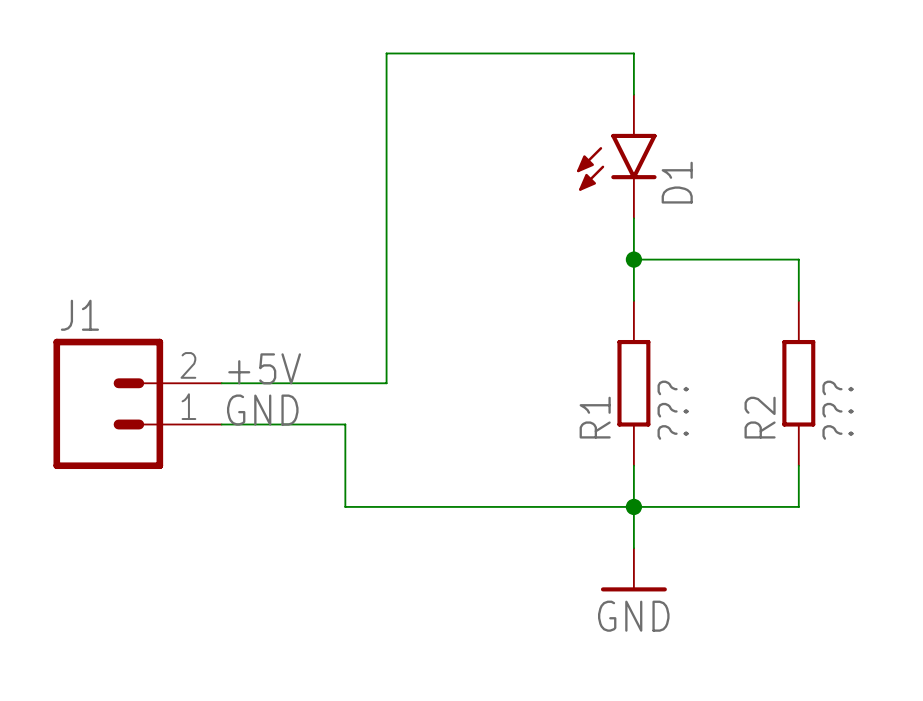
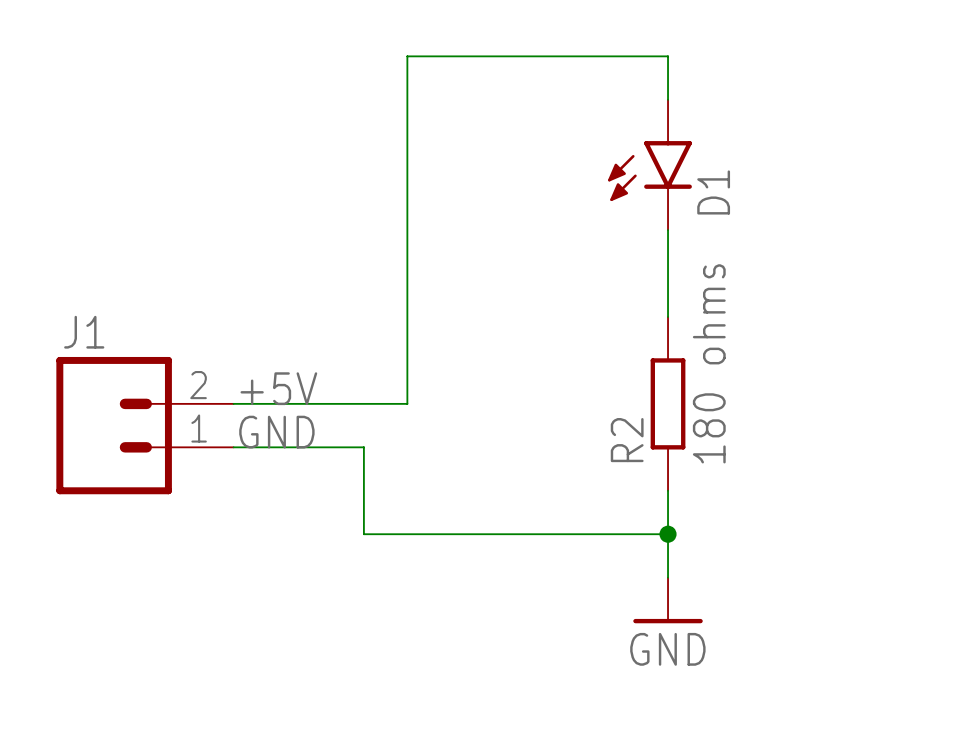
wire: (633, 259) (798, 259) (798, 300) -> none
junction: (633, 259) -> none
R2: ??? (798, 383) -> none
R1 value: ??? (673, 410) -> 180 ohms (709, 363)
R1 name: R1 (595, 417) -> R2 (627, 440)
wire: (798, 465) (798, 506) (633, 506) -> none

